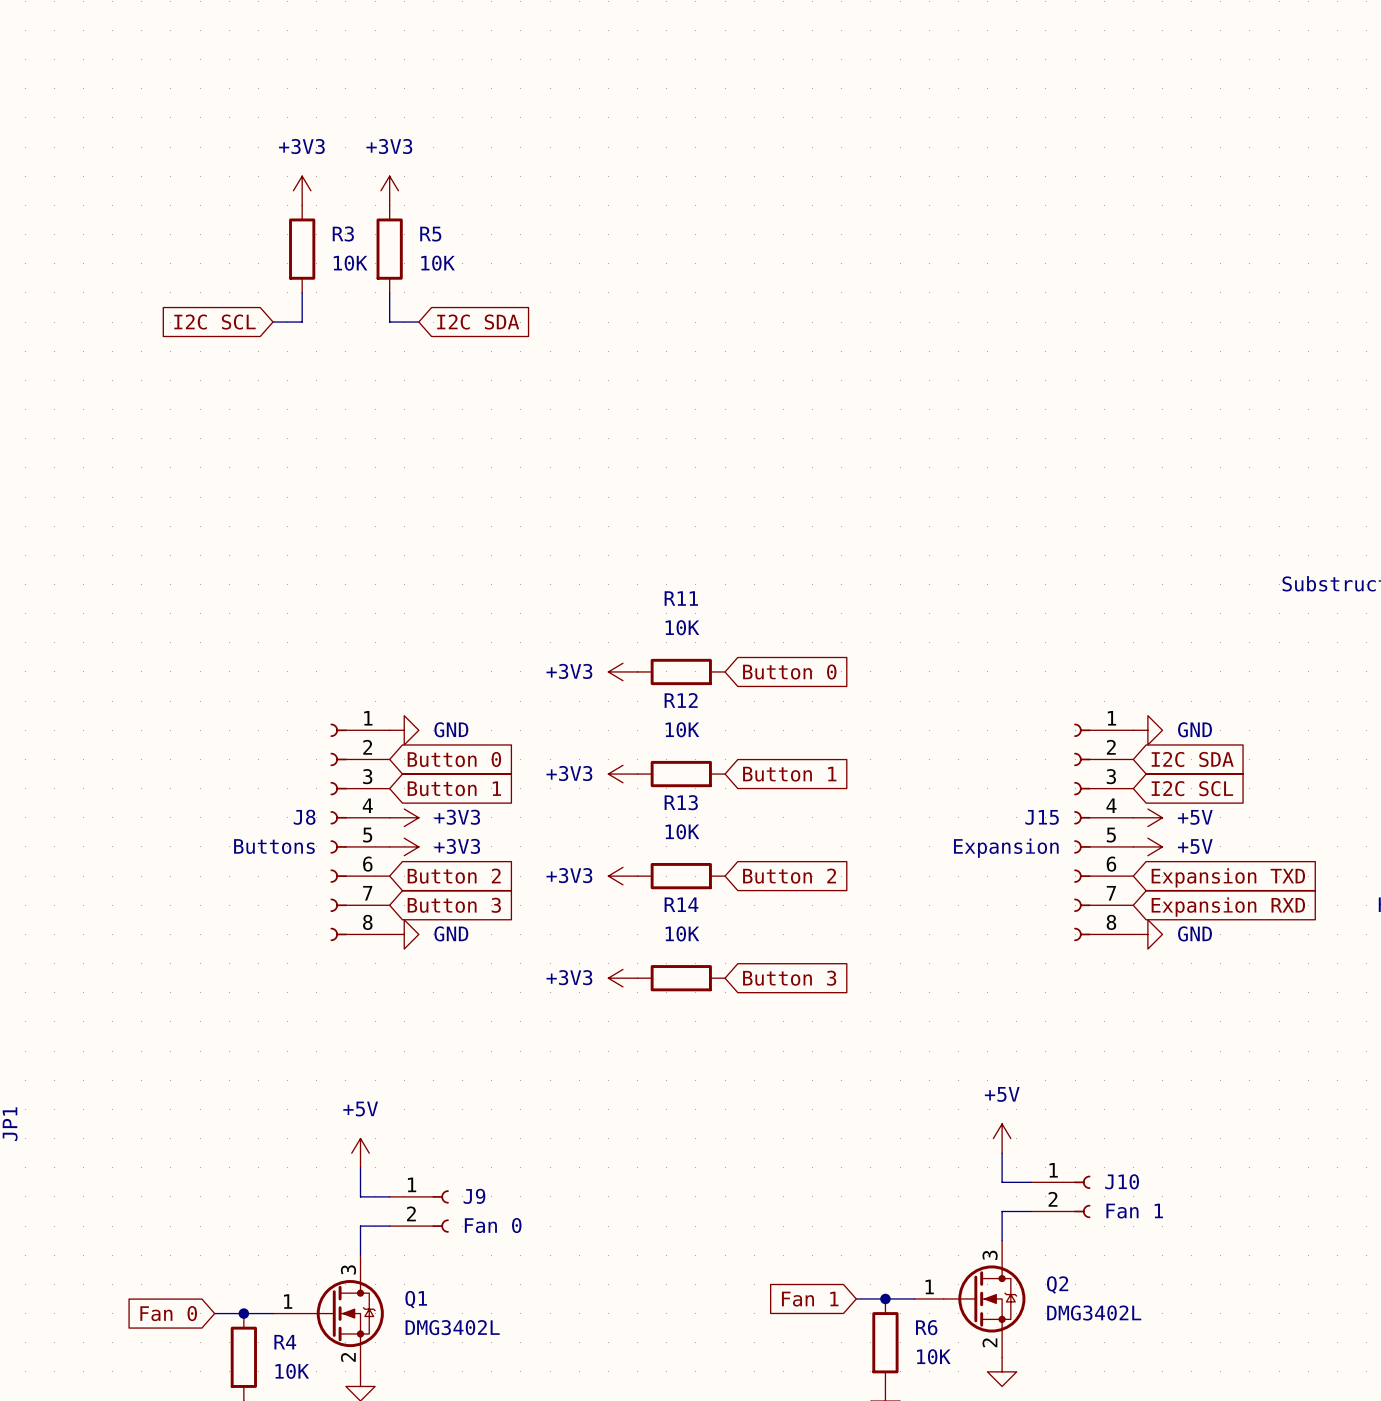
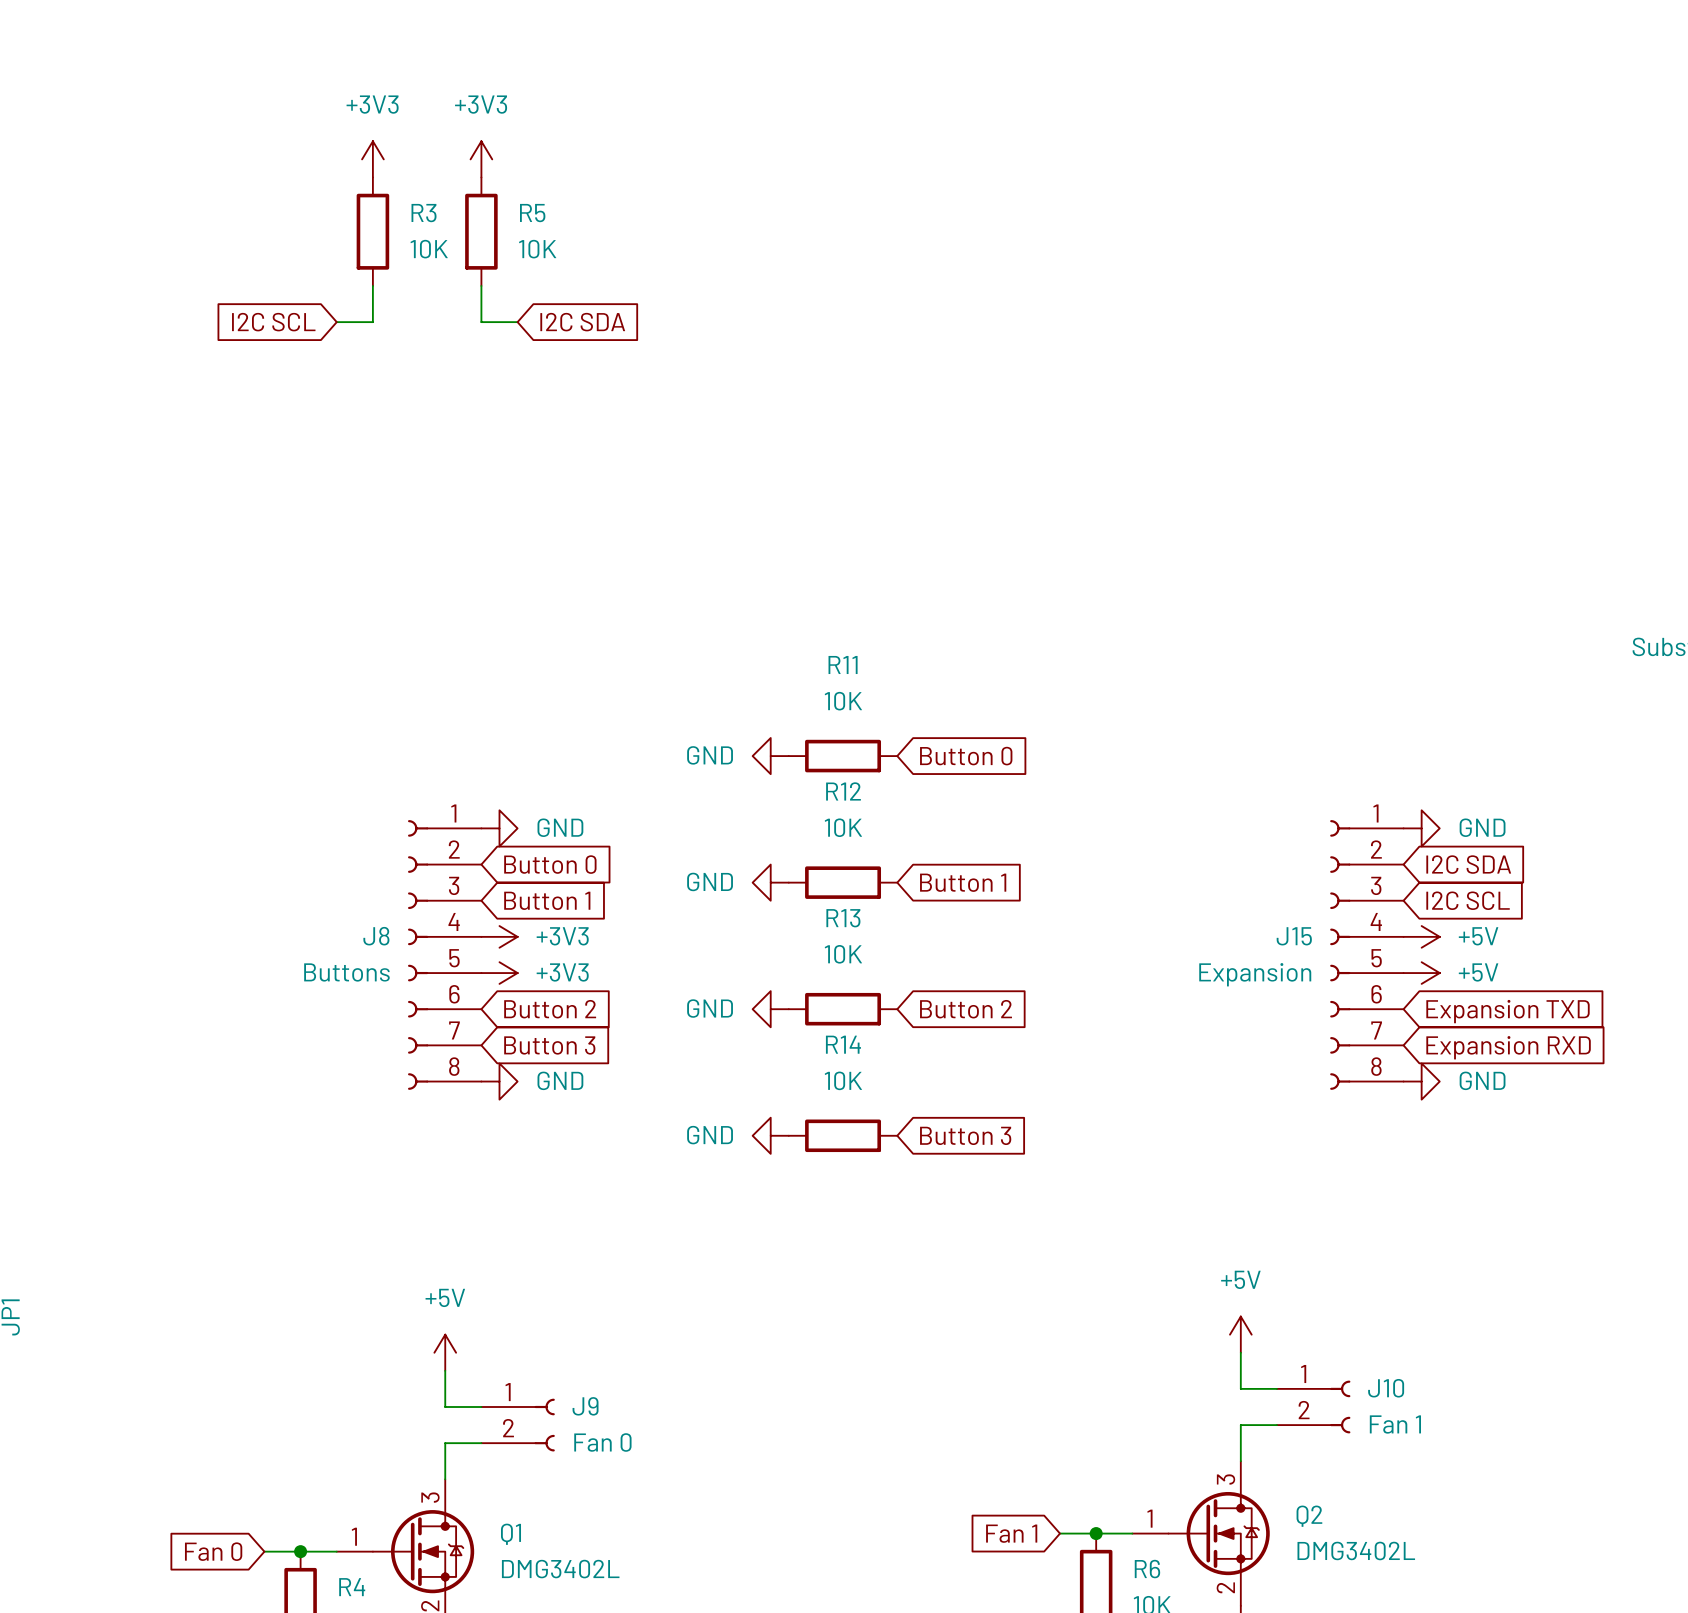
power symbol: +3V3 (622, 671) -> GND (770, 756)
power symbol: +3V3 (622, 774) -> GND (770, 882)
power symbol: +3V3 (622, 876) -> GND (770, 1009)
power symbol: +3V3 (622, 978) -> GND (770, 1135)

